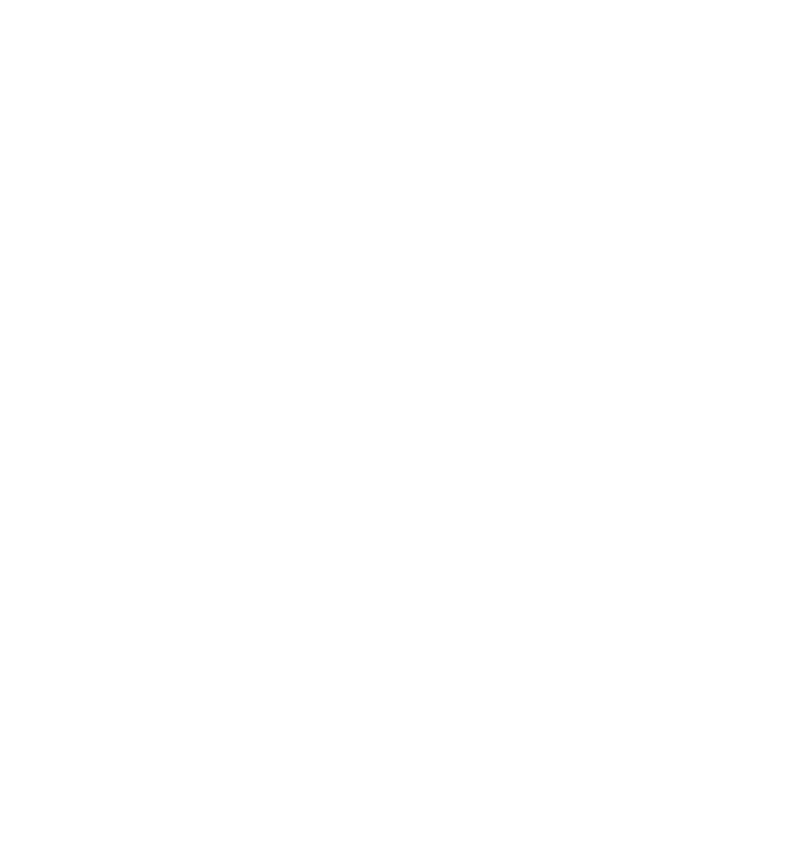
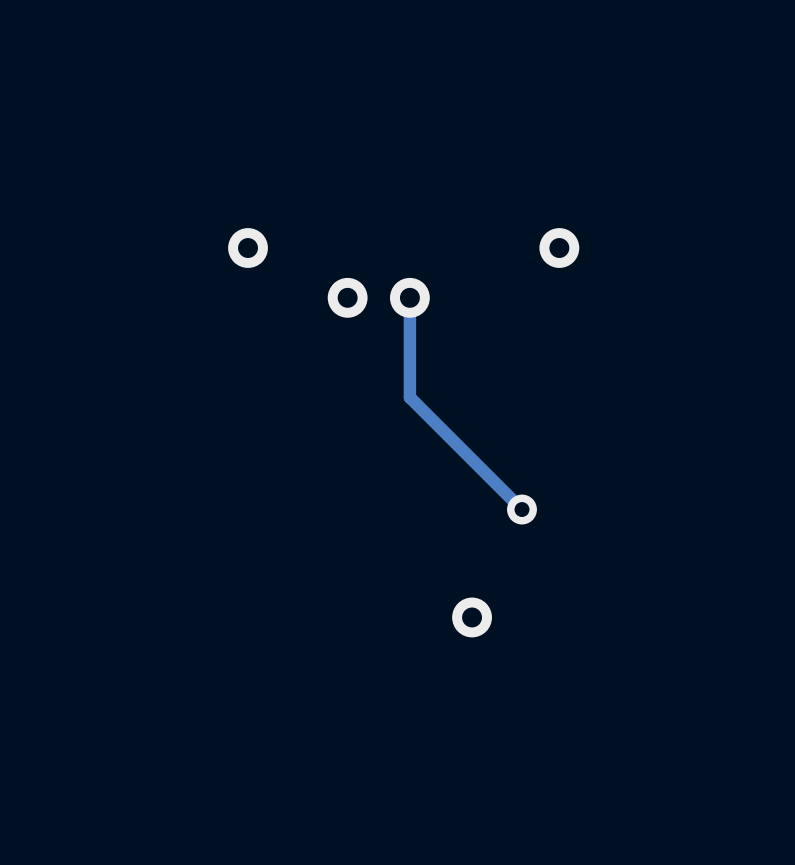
via: none -> (248, 248)
via: none -> (559, 248)
via: none -> (347, 297)
track: none -> (409, 297) (409, 397) (521, 509)
via: none -> (409, 297)
via: none -> (521, 509)
via: none -> (472, 617)

